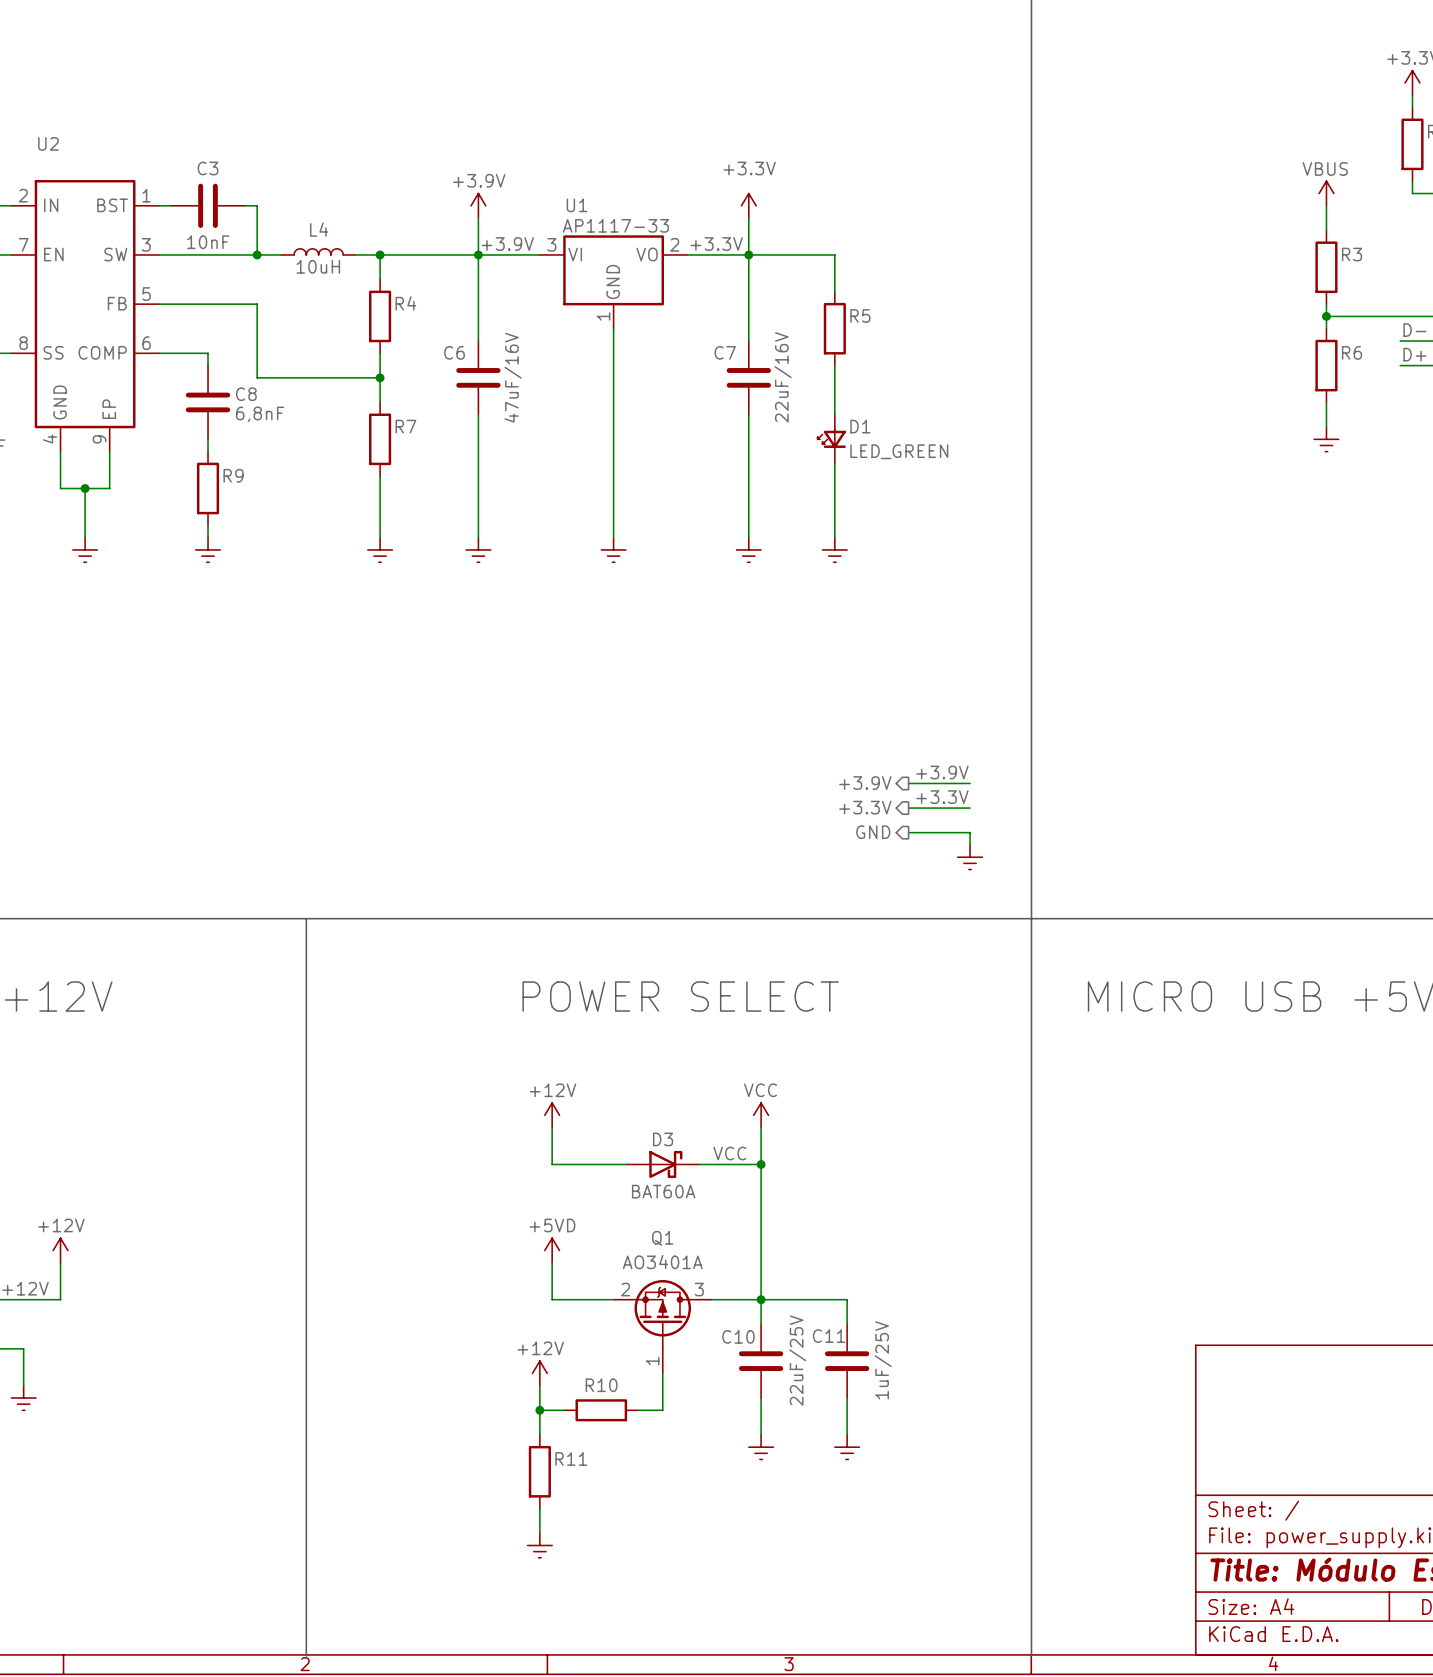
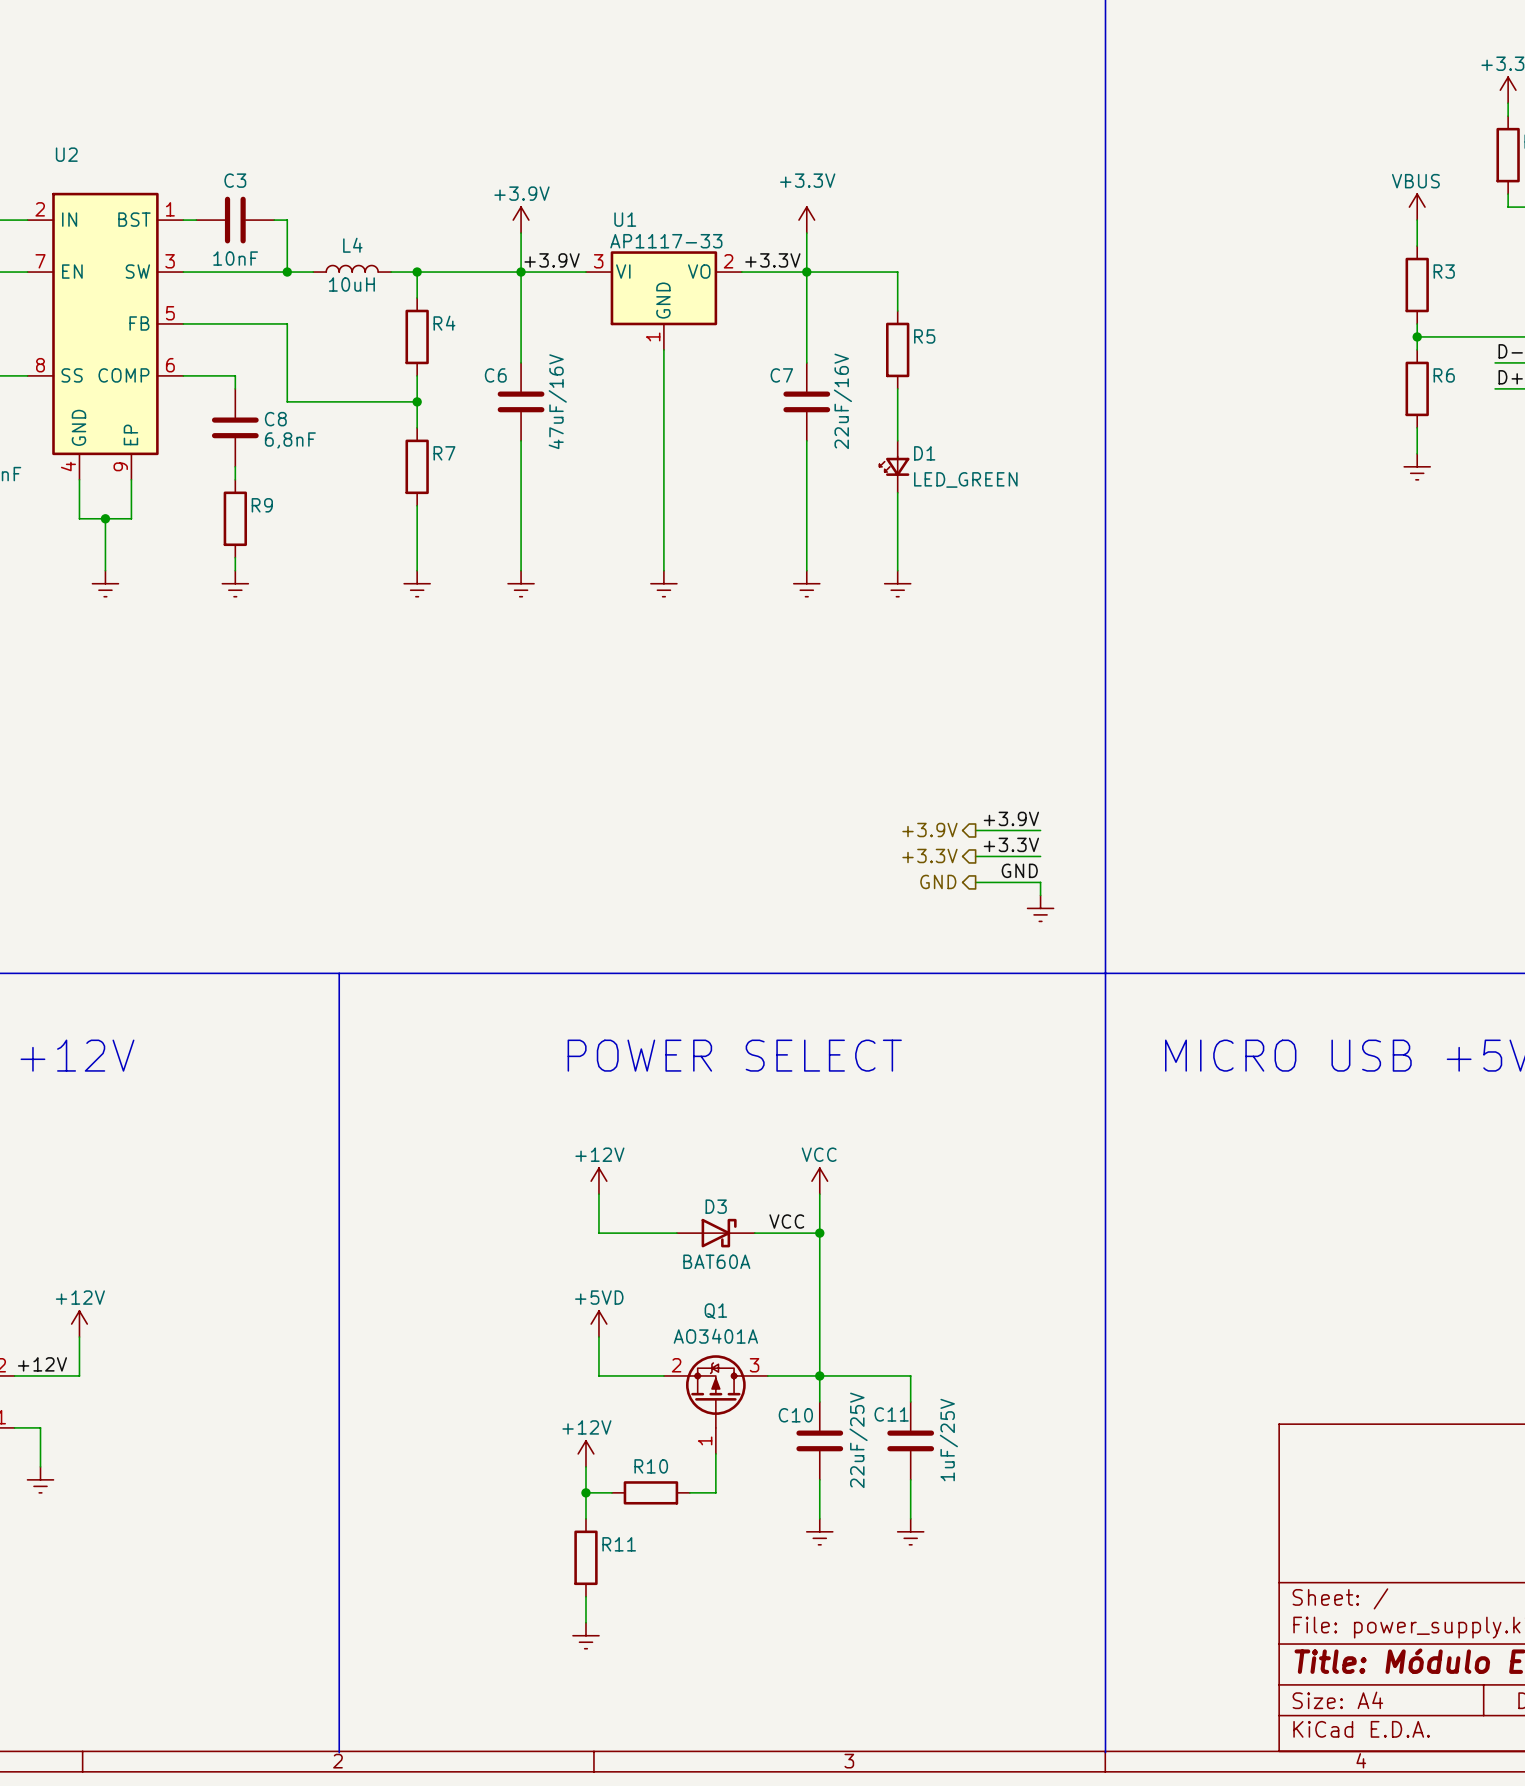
label: none -> GND (1019, 870)

